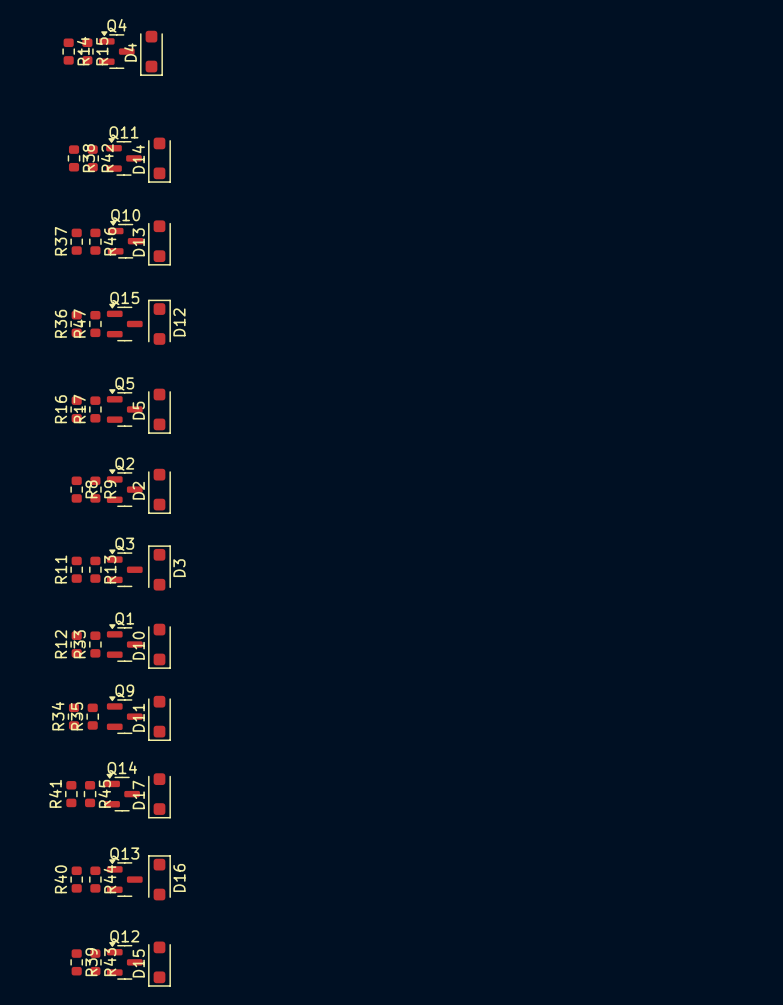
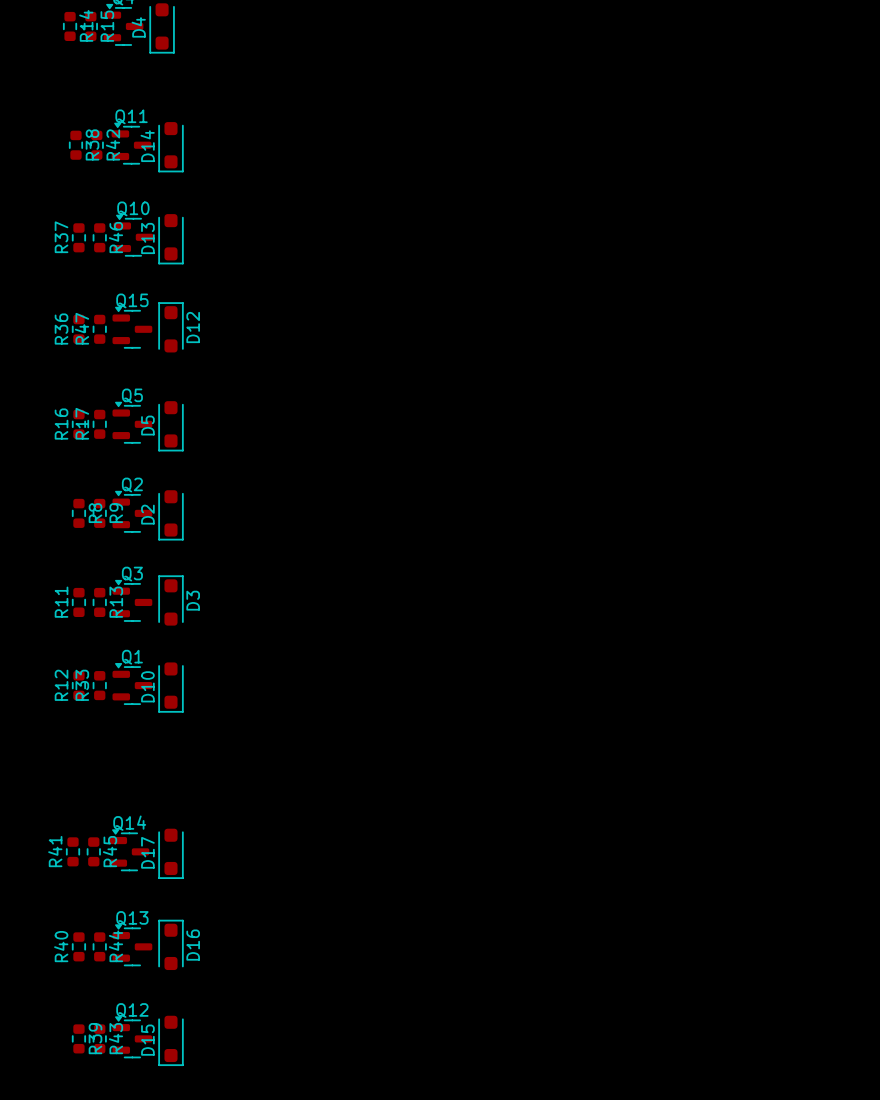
Q9: (124, 715) -> none
R34: (74, 716) -> none
R35: (92, 716) -> none
D11: (159, 718) -> none

